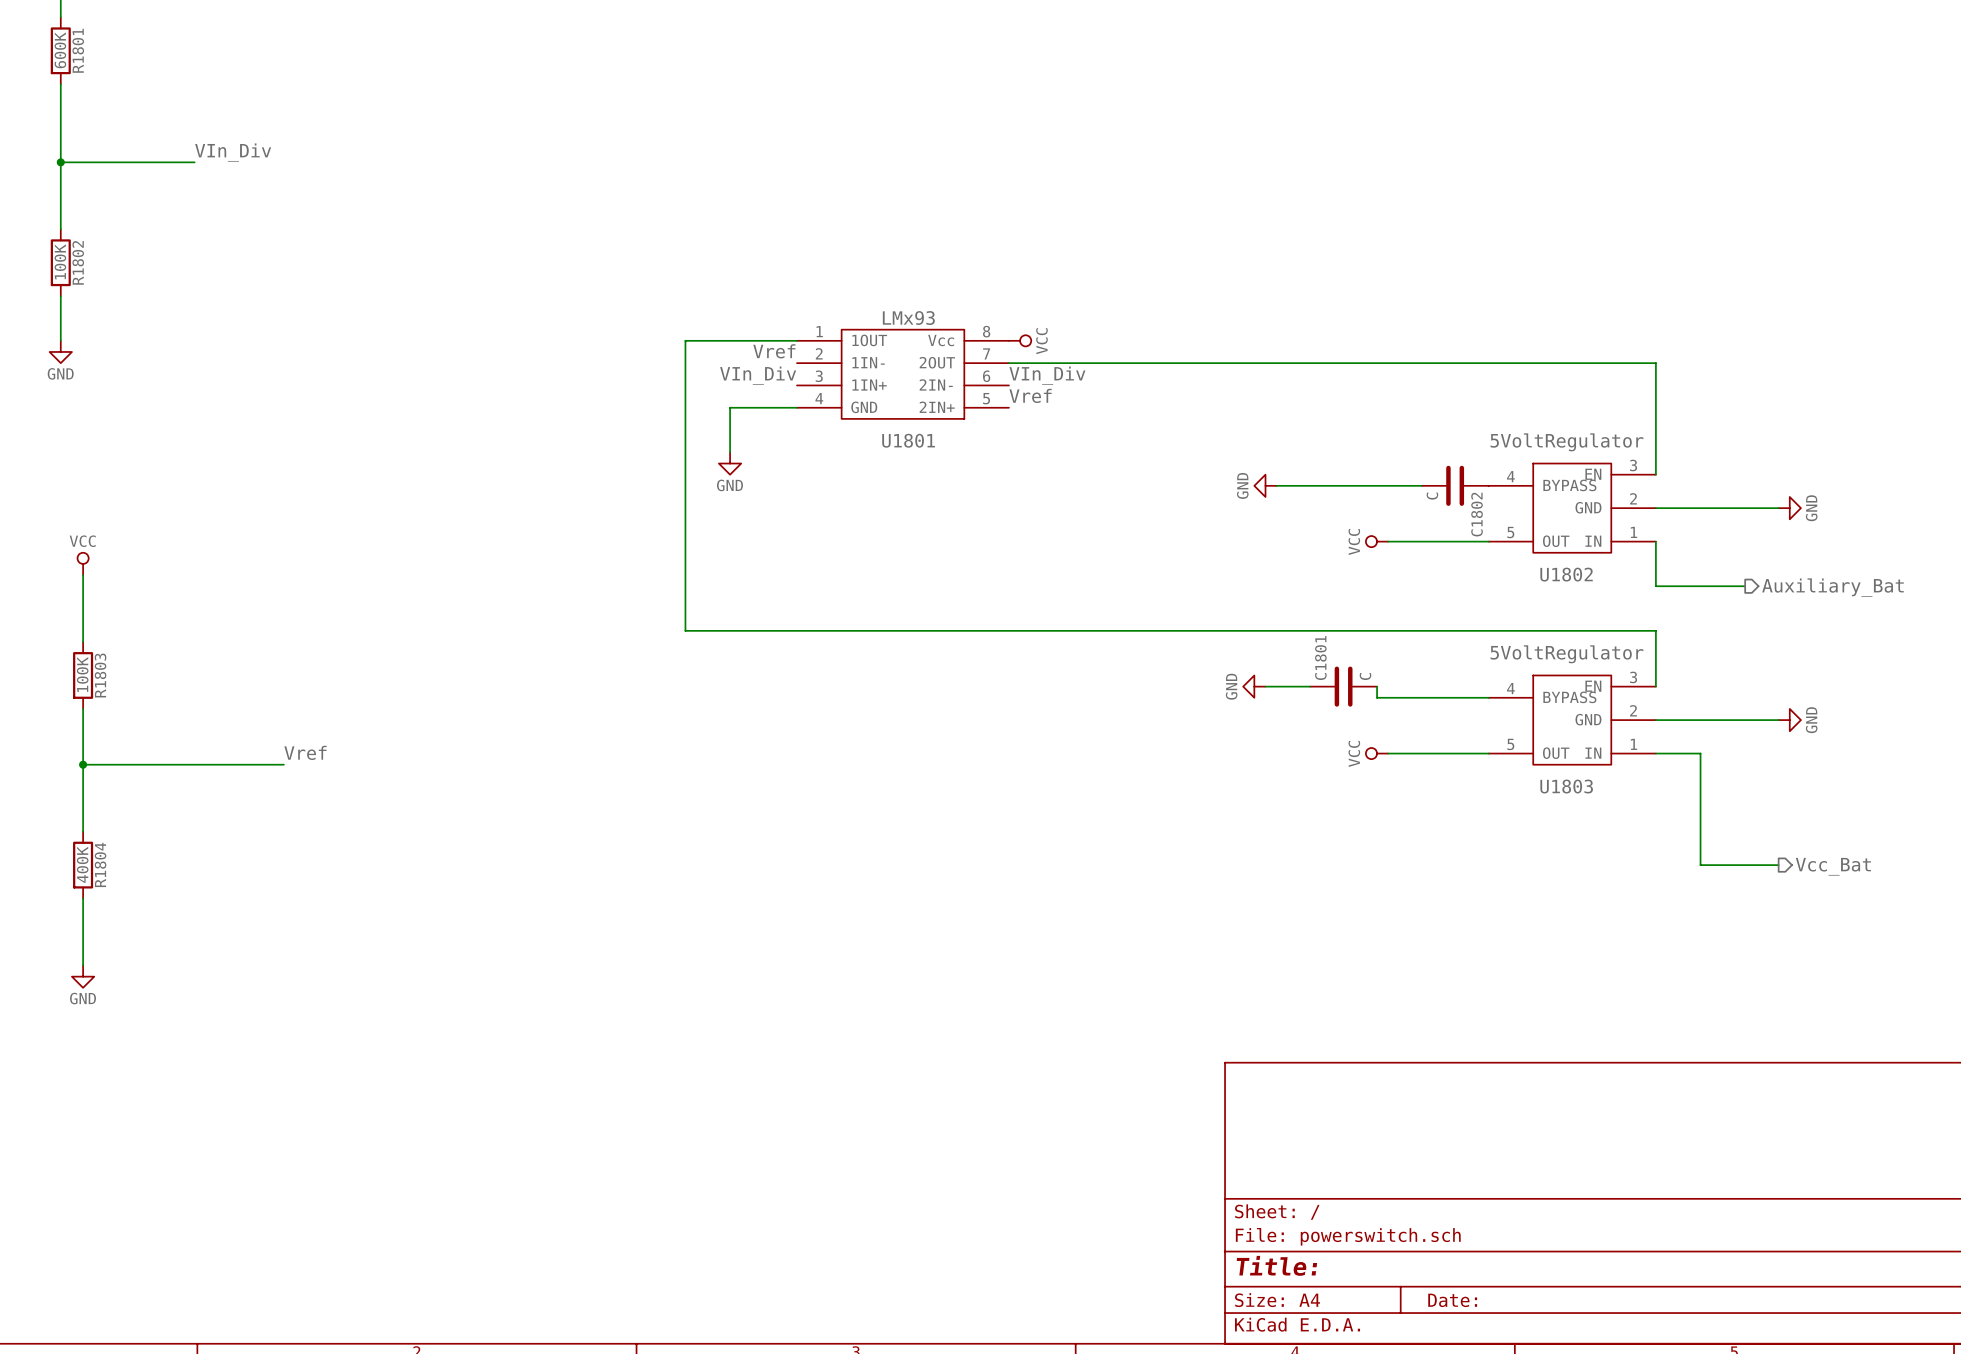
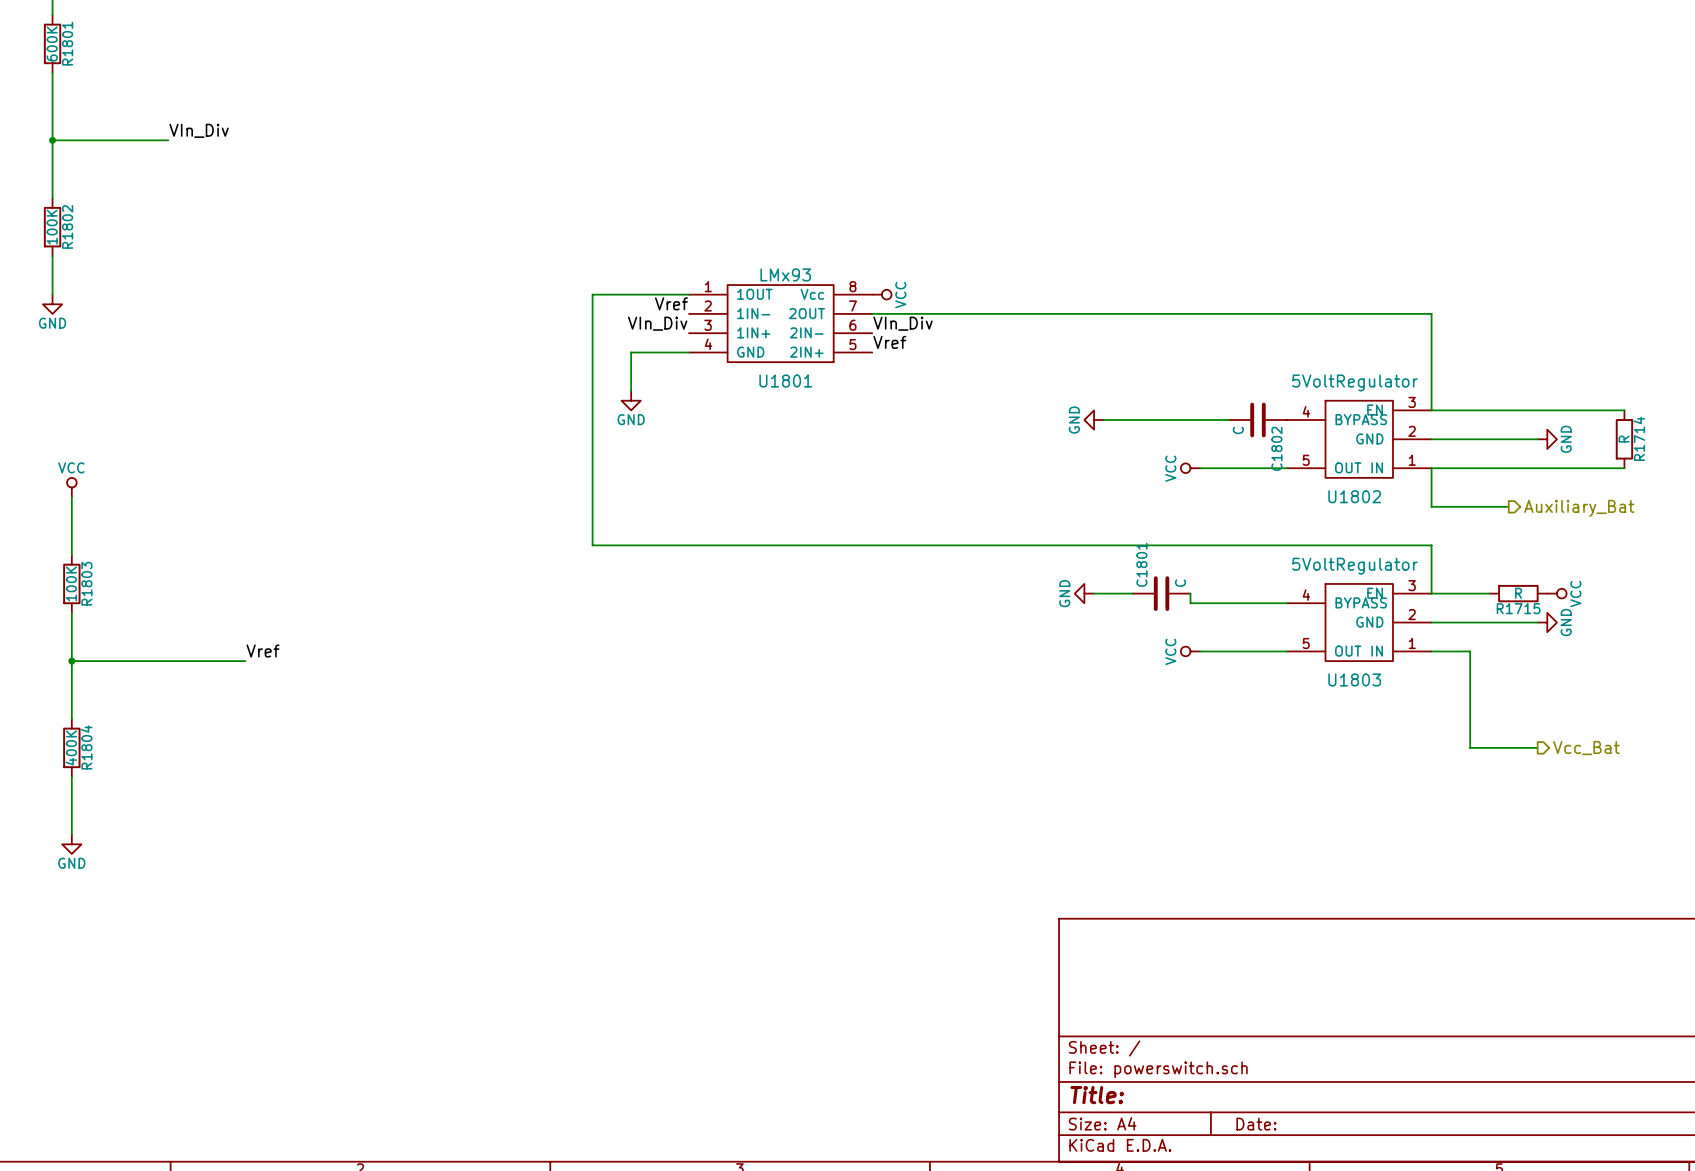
wire: none -> (1431, 410) (1624, 410)
R1714: none -> R (1624, 439)
wire: none -> (1431, 468) (1624, 468)
wire: none -> (1431, 593) (1489, 593)
R1715: none -> R (1518, 593)
power symbol: none -> VCC (1556, 593)

